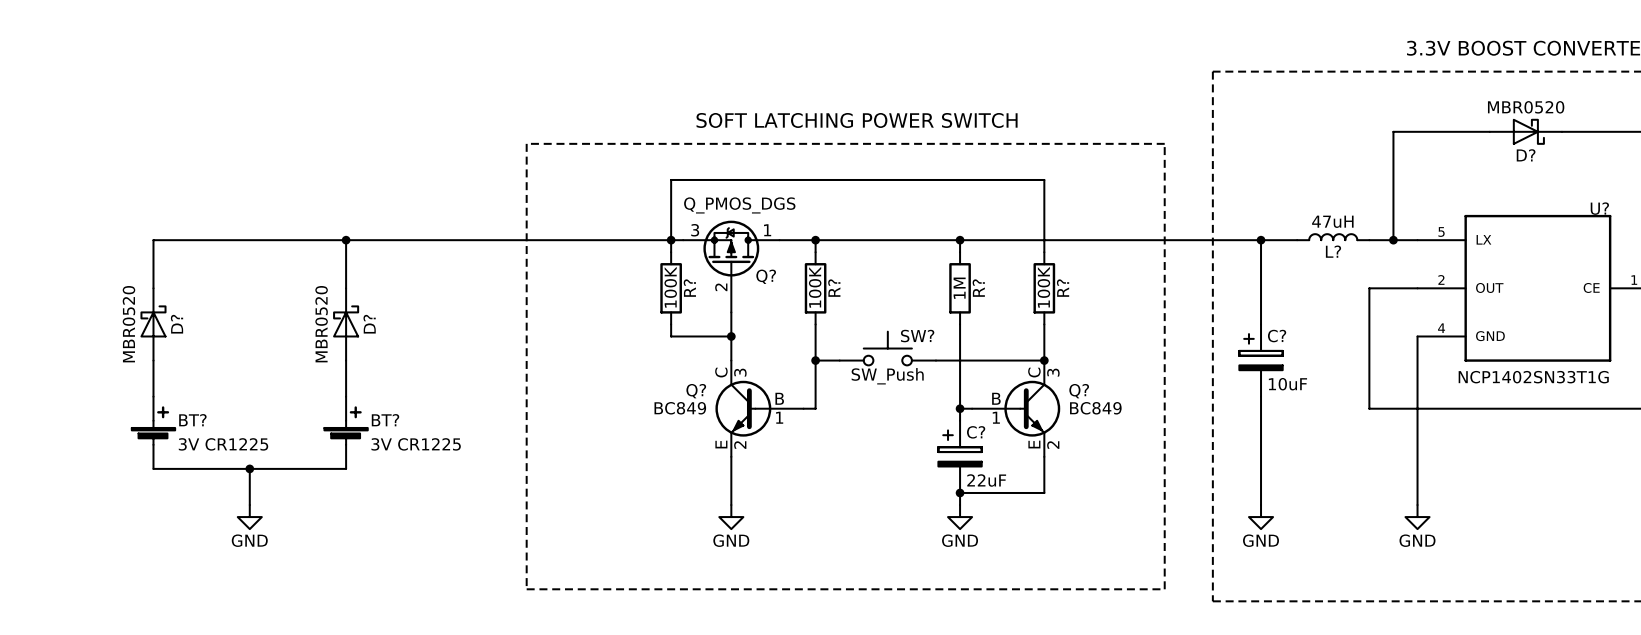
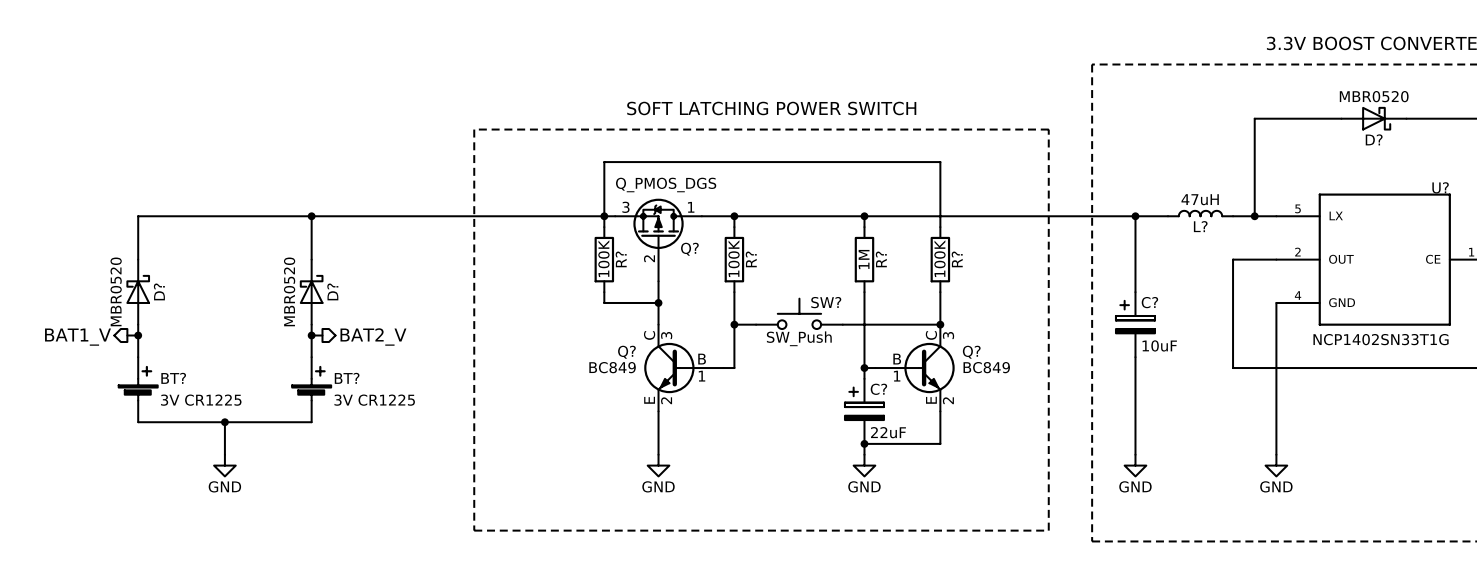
wire: none -> (127, 335) (138, 335)
junction: none -> (138, 335)
wire: none -> (311, 335) (322, 335)
junction: none -> (311, 335)
hierarchical label: none -> BAT1_V (77, 337)
hierarchical label: none -> BAT2_V (373, 337)

